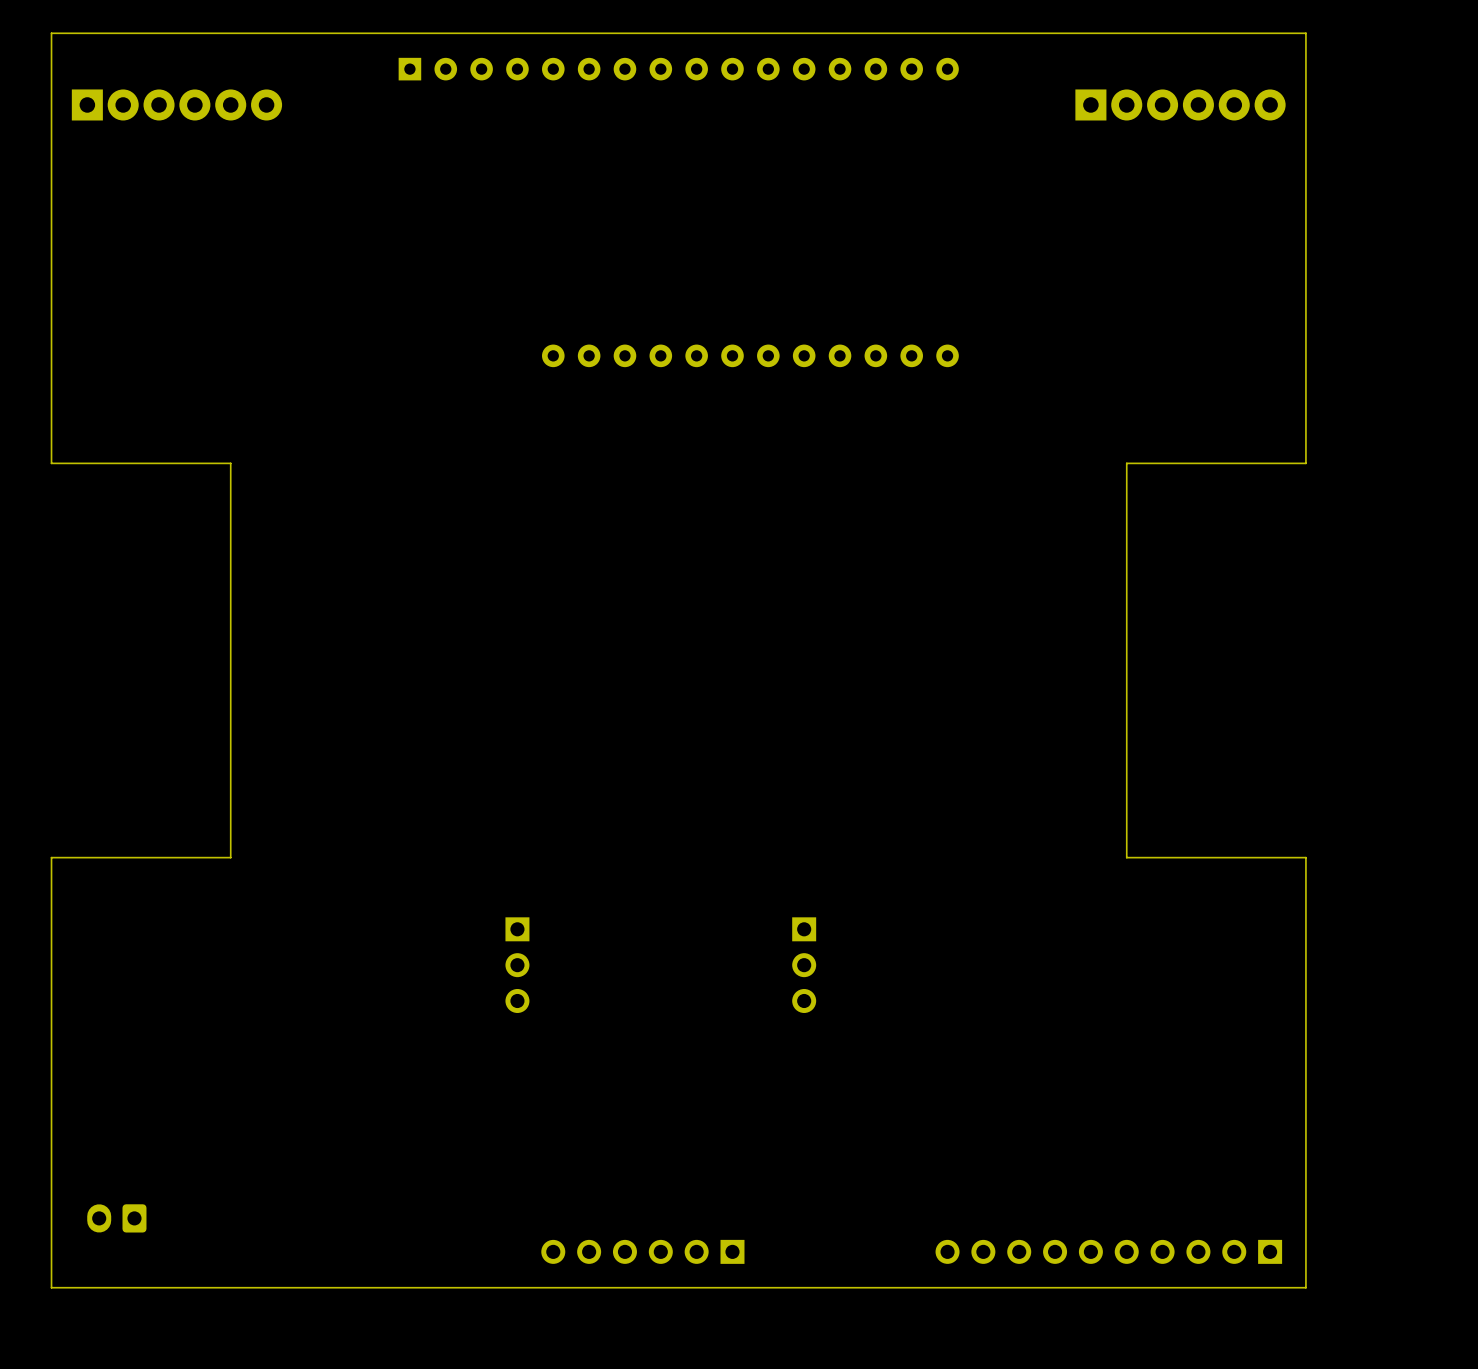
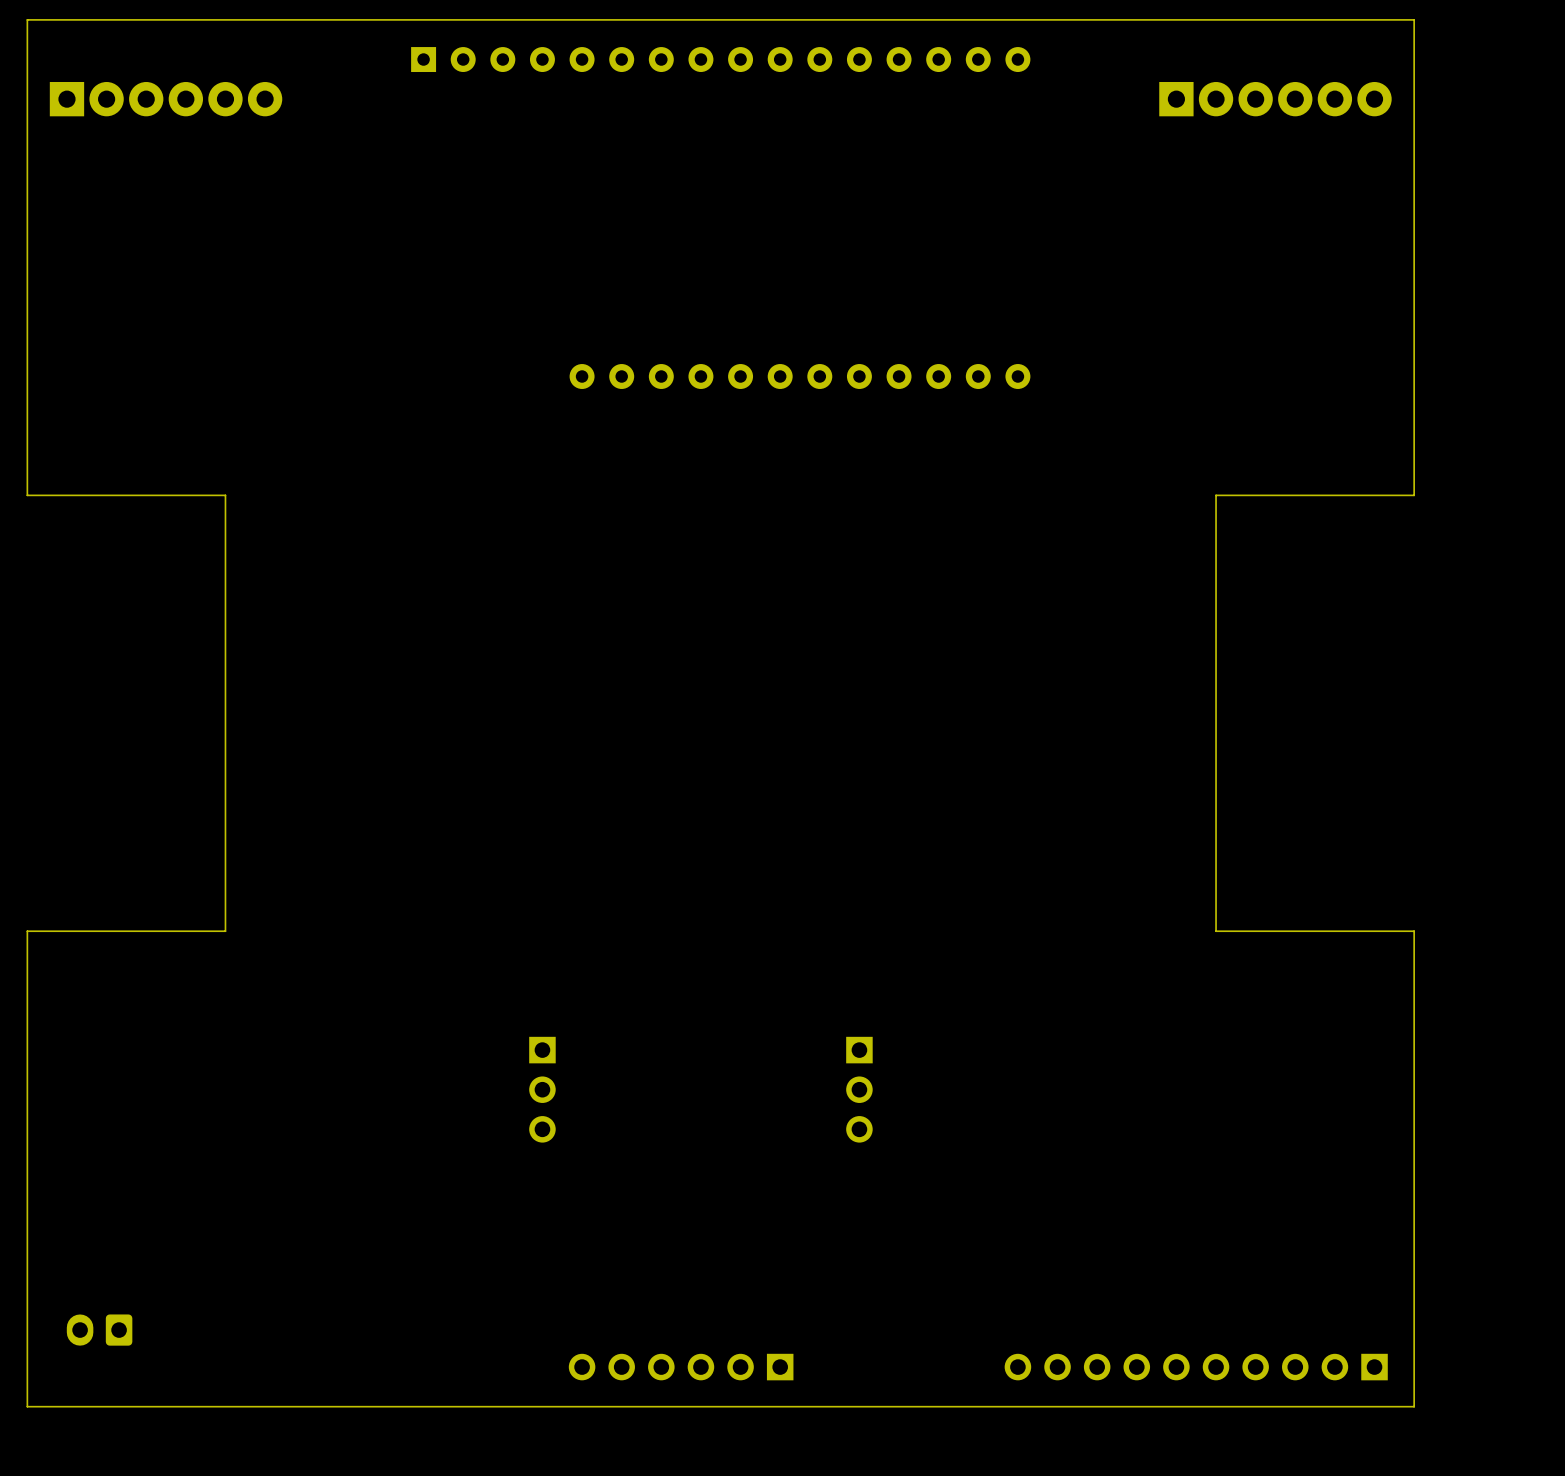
part position: (517, 965) -> (542, 1089)
part position: (804, 965) -> (859, 1089)

